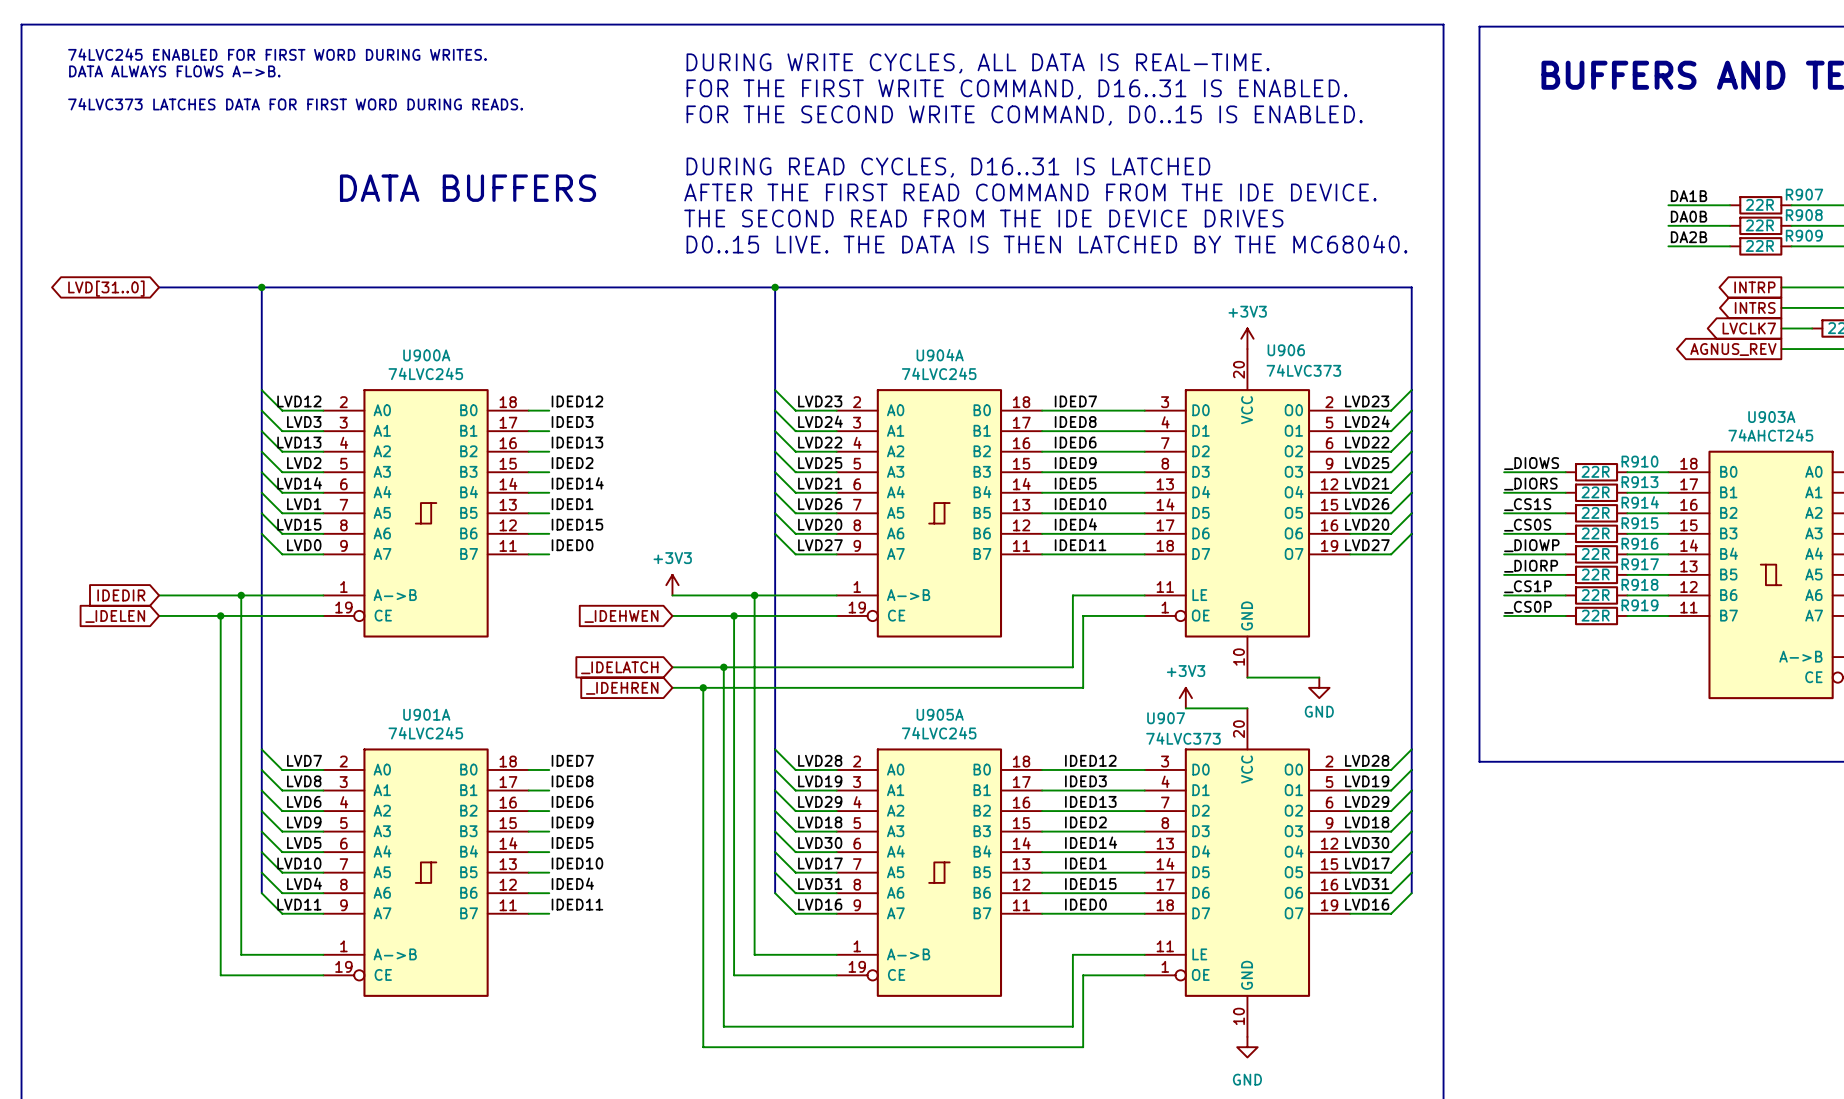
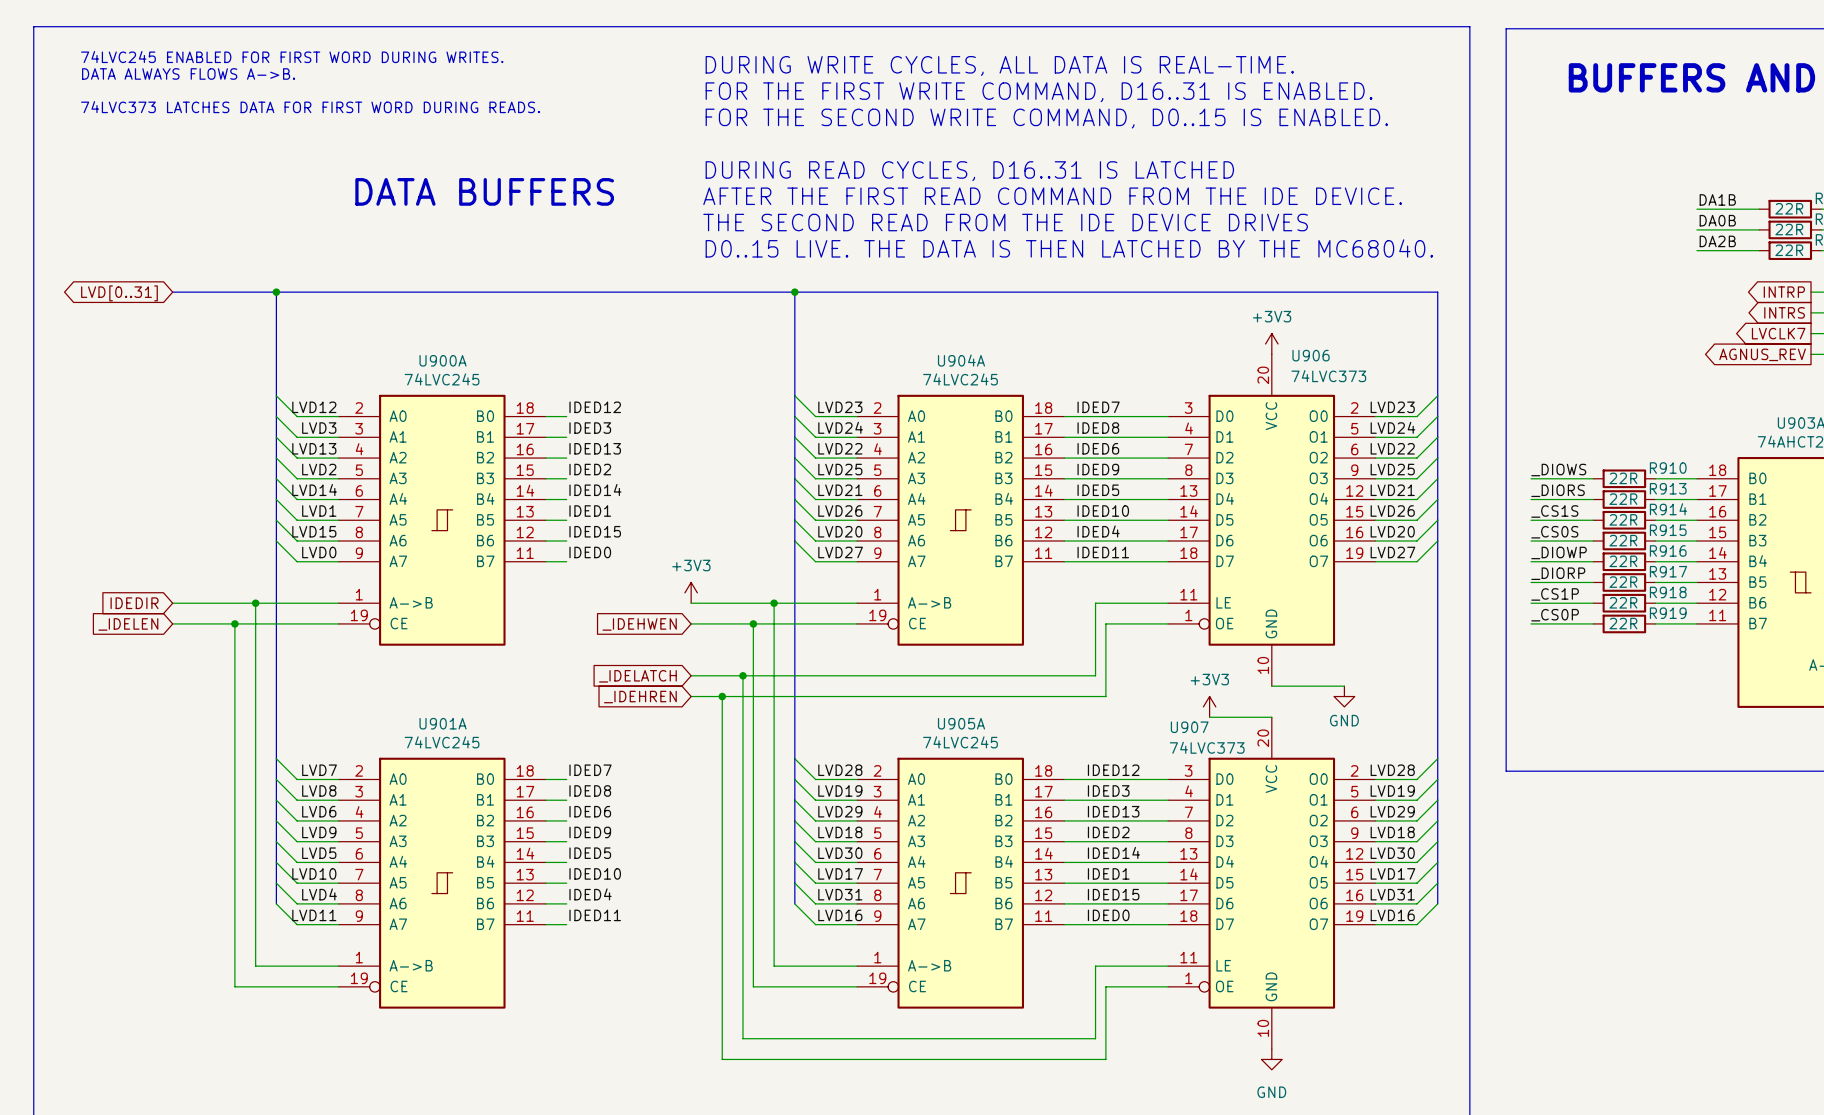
global label: LVD[31..0] (106, 288) -> LVD[0..31] (119, 293)

